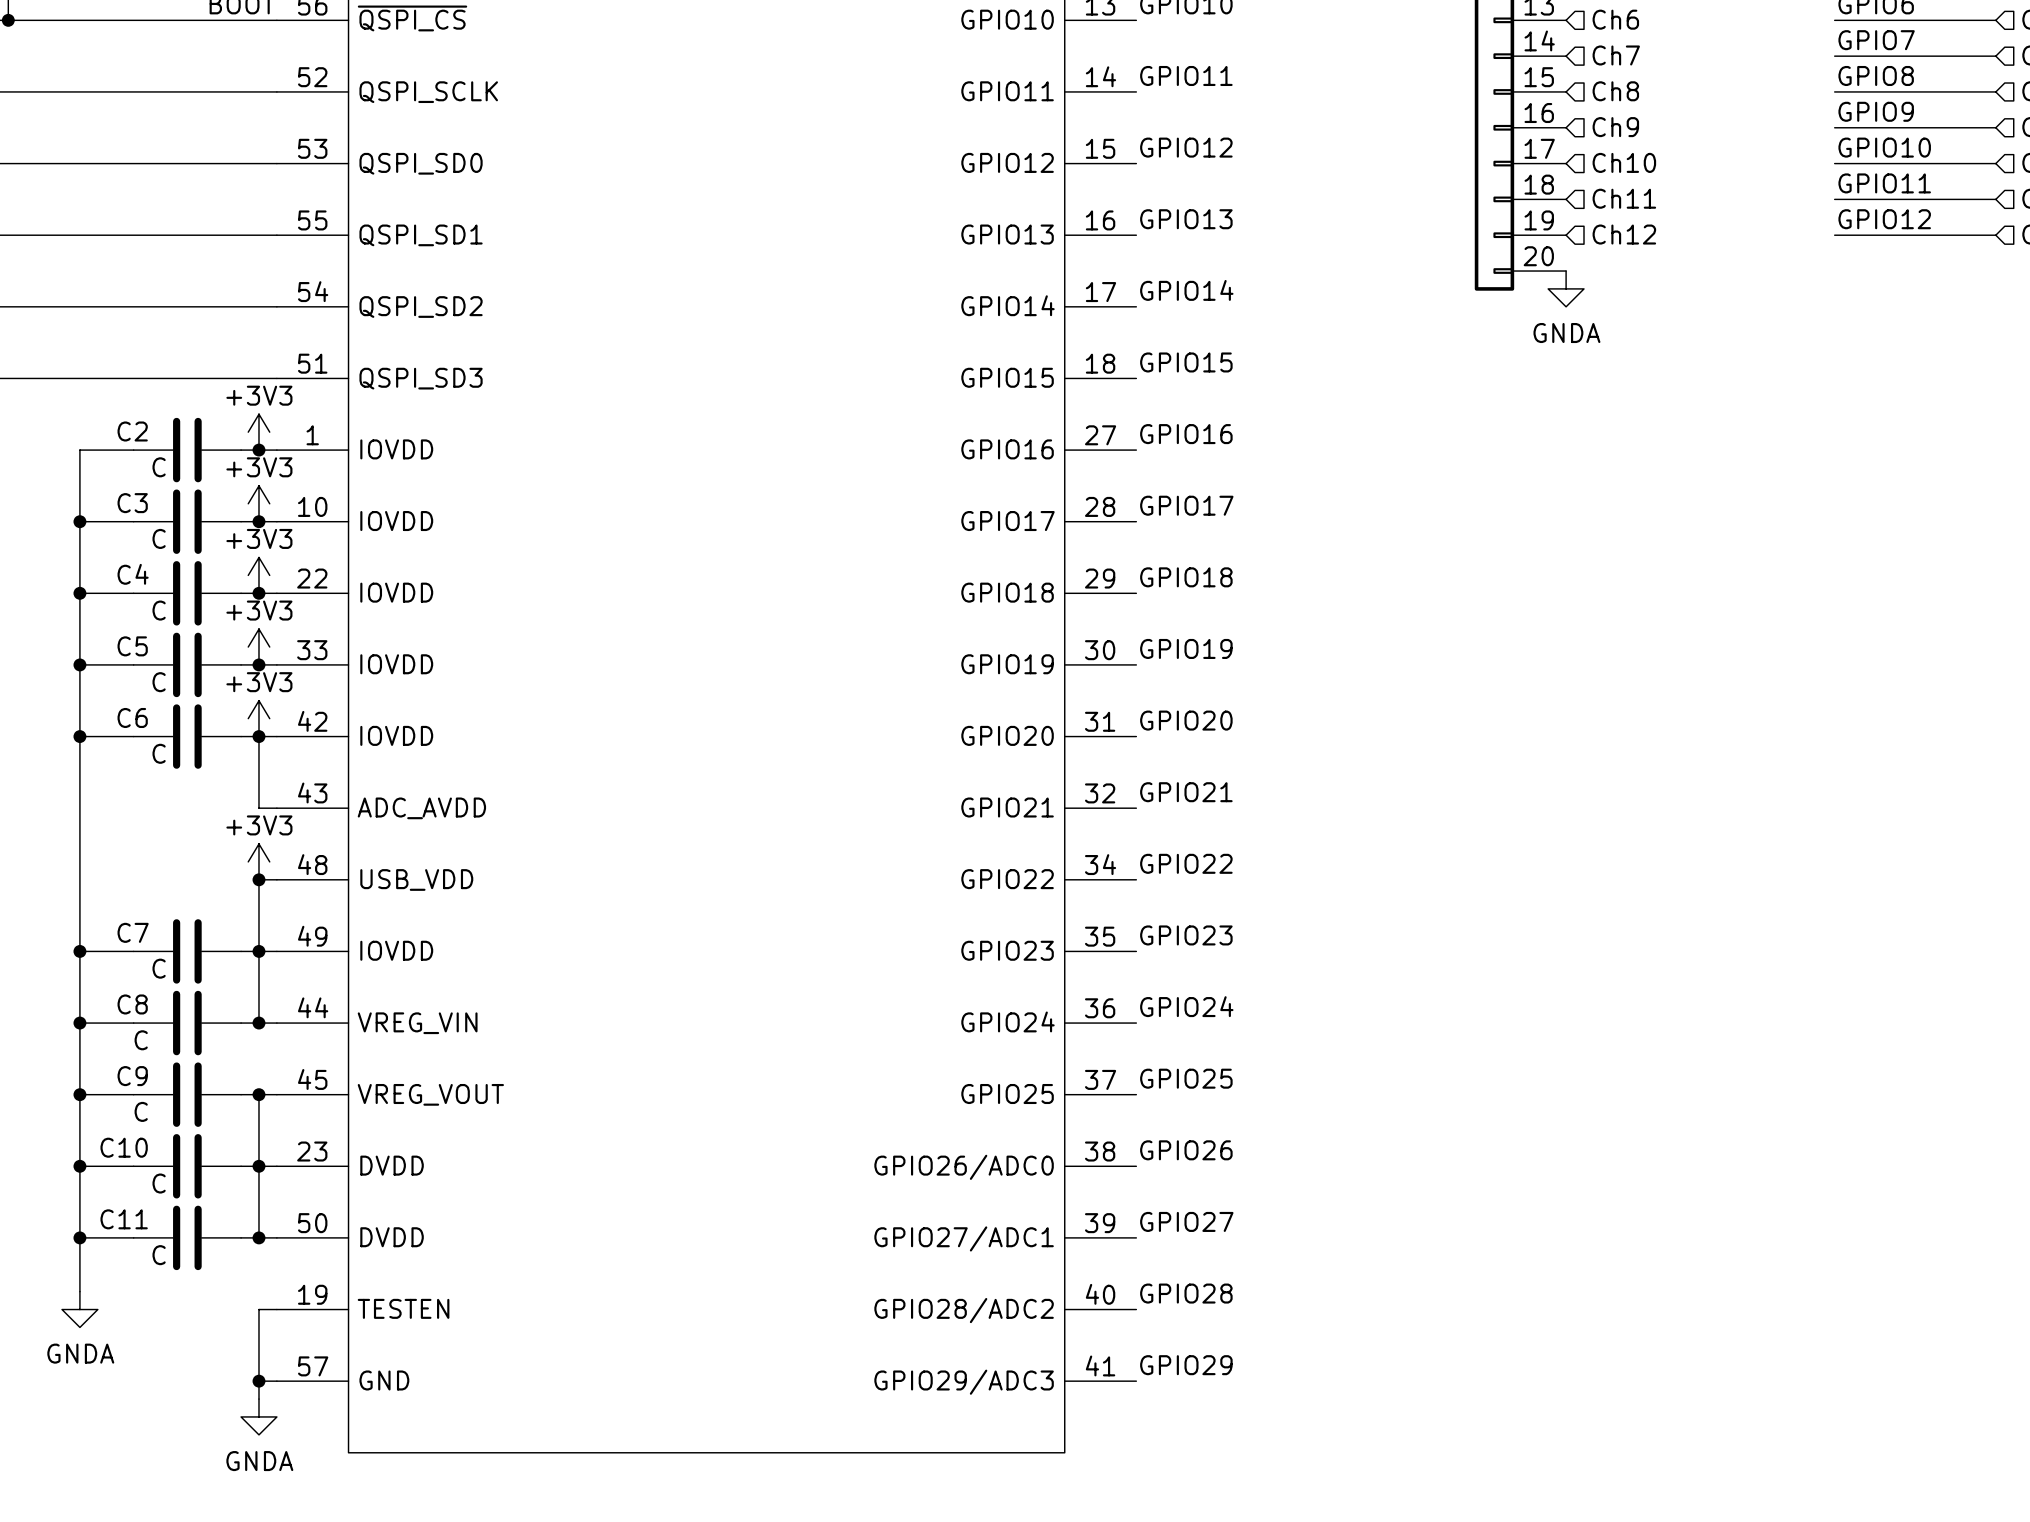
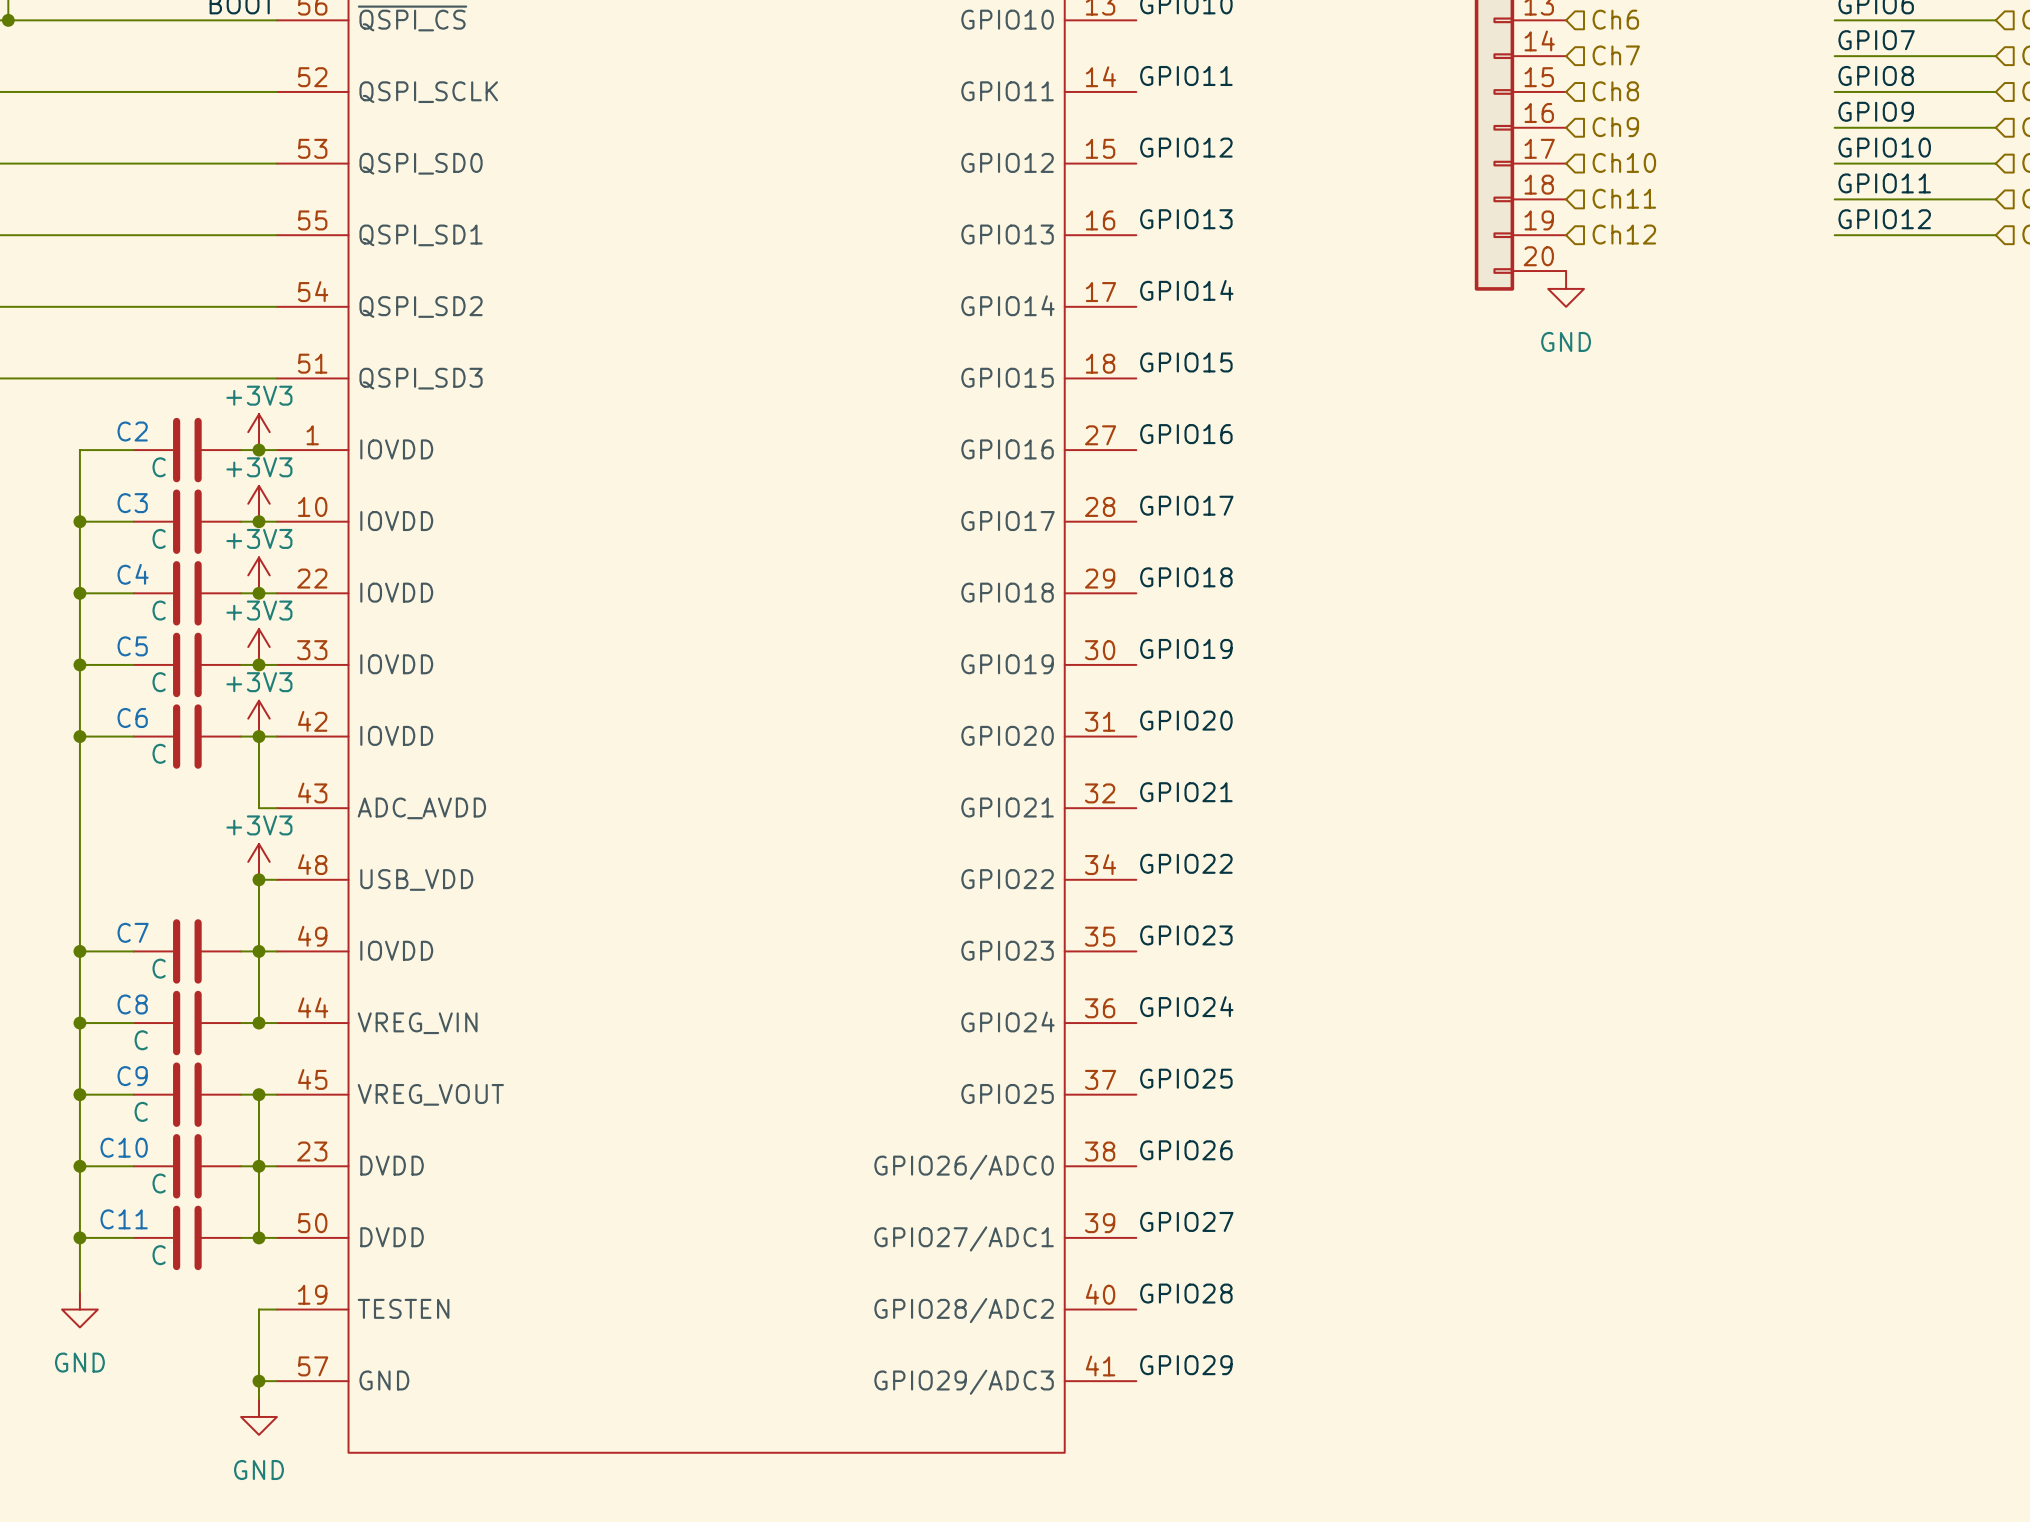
power symbol: GNDA (1566, 288) -> GND (1566, 288)
power symbol: GNDA (79, 1309) -> GND (79, 1309)
power symbol: GNDA (258, 1416) -> GND (258, 1416)

